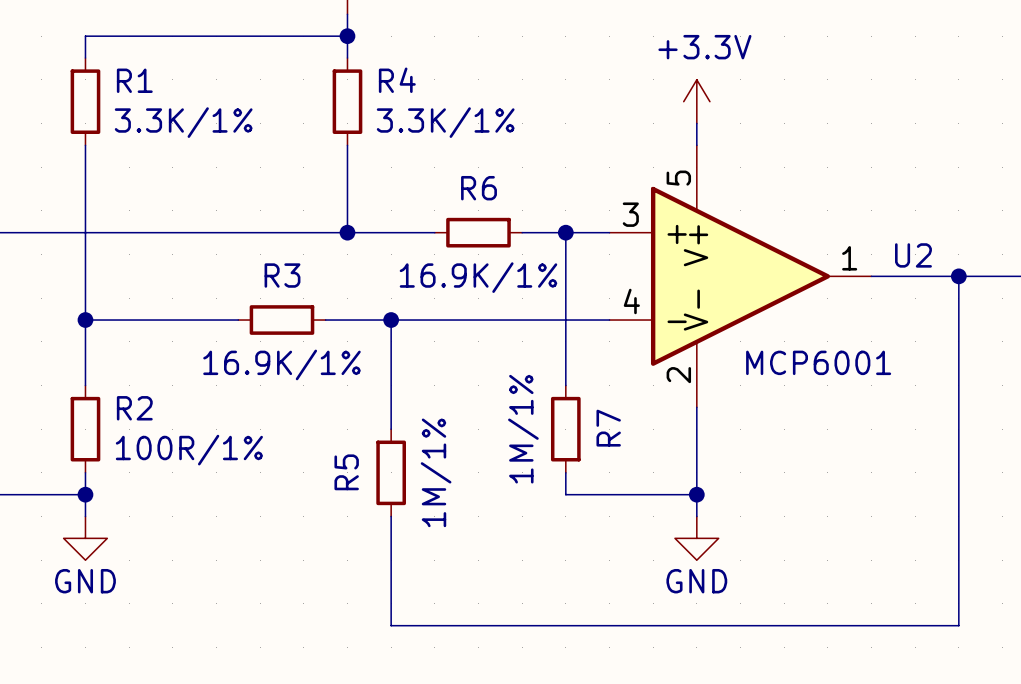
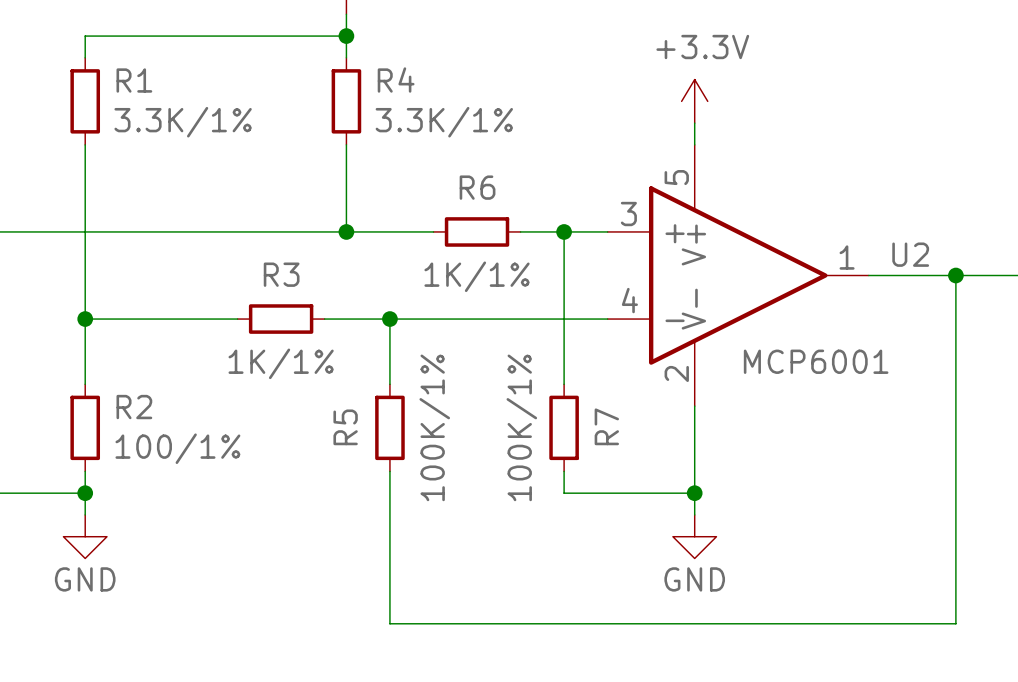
R6 value: 16.9K/1% (478, 277) -> 1K/1% (477, 276)
R3 value: 16.9K/1% (281, 364) -> 1K/1% (281, 363)
wire: (391, 385) (391, 429) -> (389, 471) (389, 514)
R7 value: 1M/1% (523, 429) -> 100K/1% (521, 427)
R2 value: 100R/1% (189, 450) -> 100/1% (177, 448)
R5 position: (391, 472) -> (389, 427)
R5 value: 1M/1% (436, 472) -> 100K/1% (434, 427)

